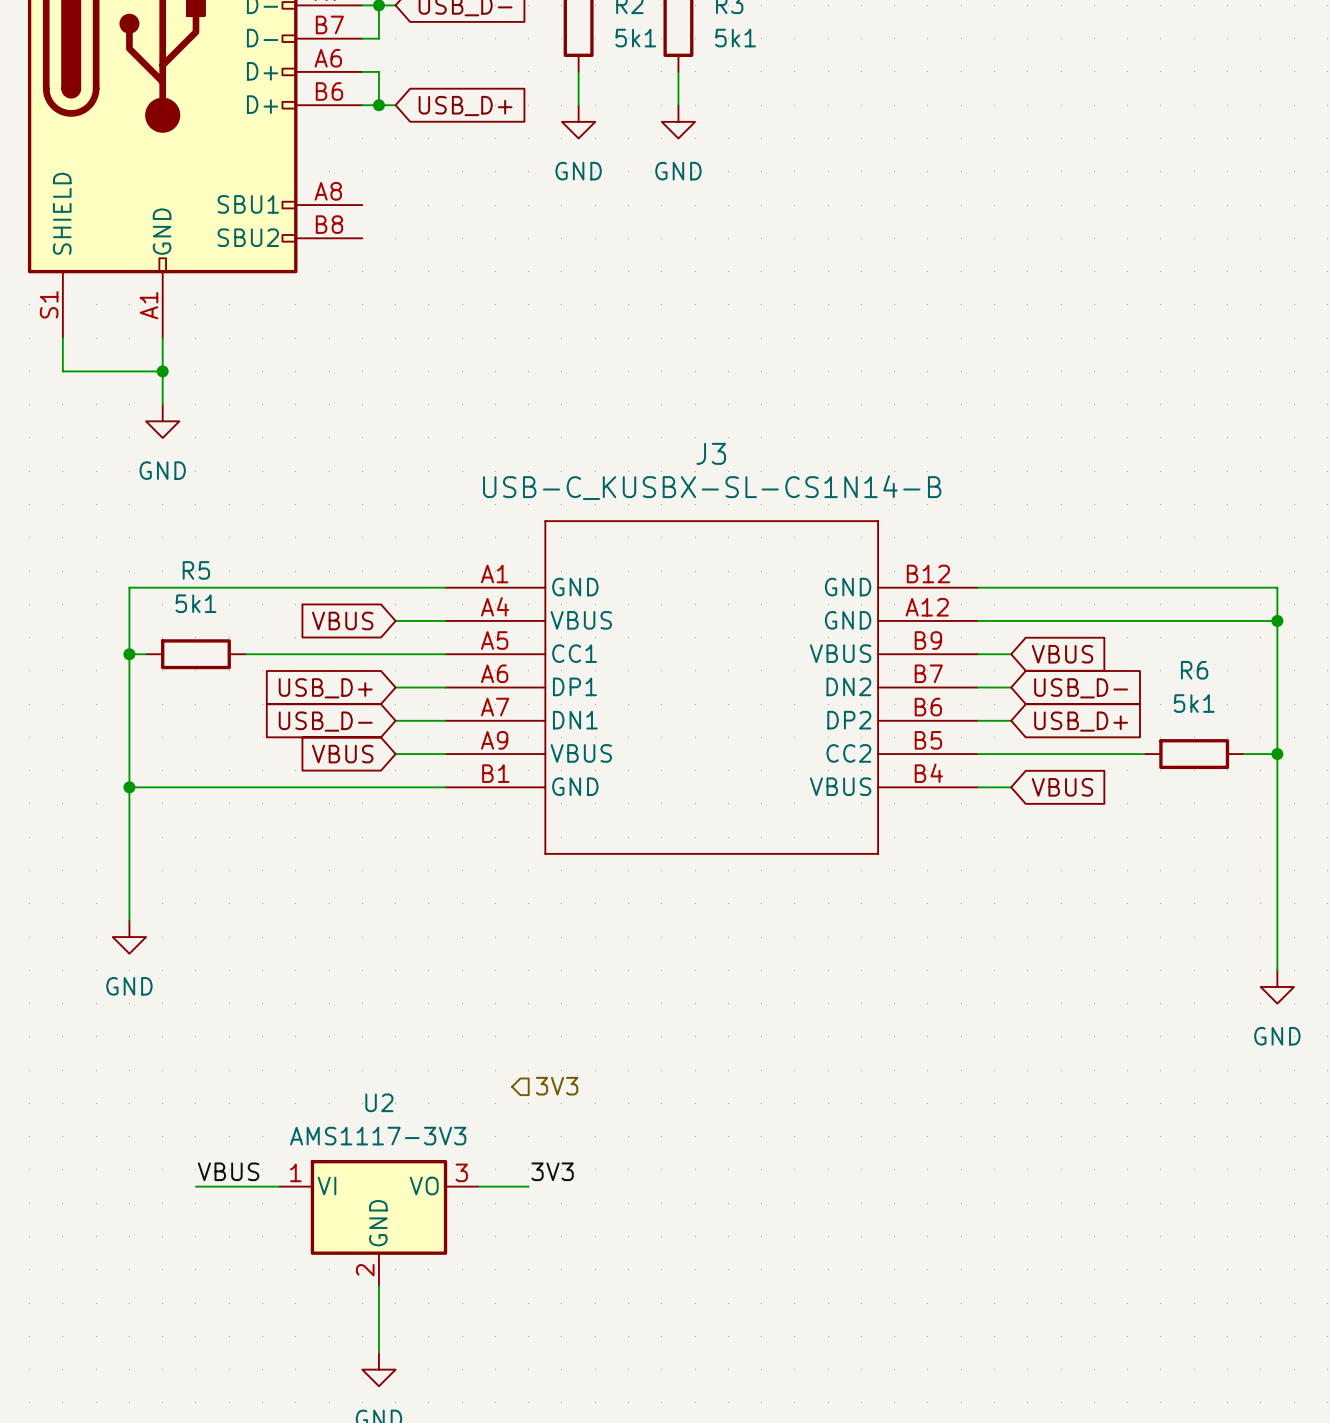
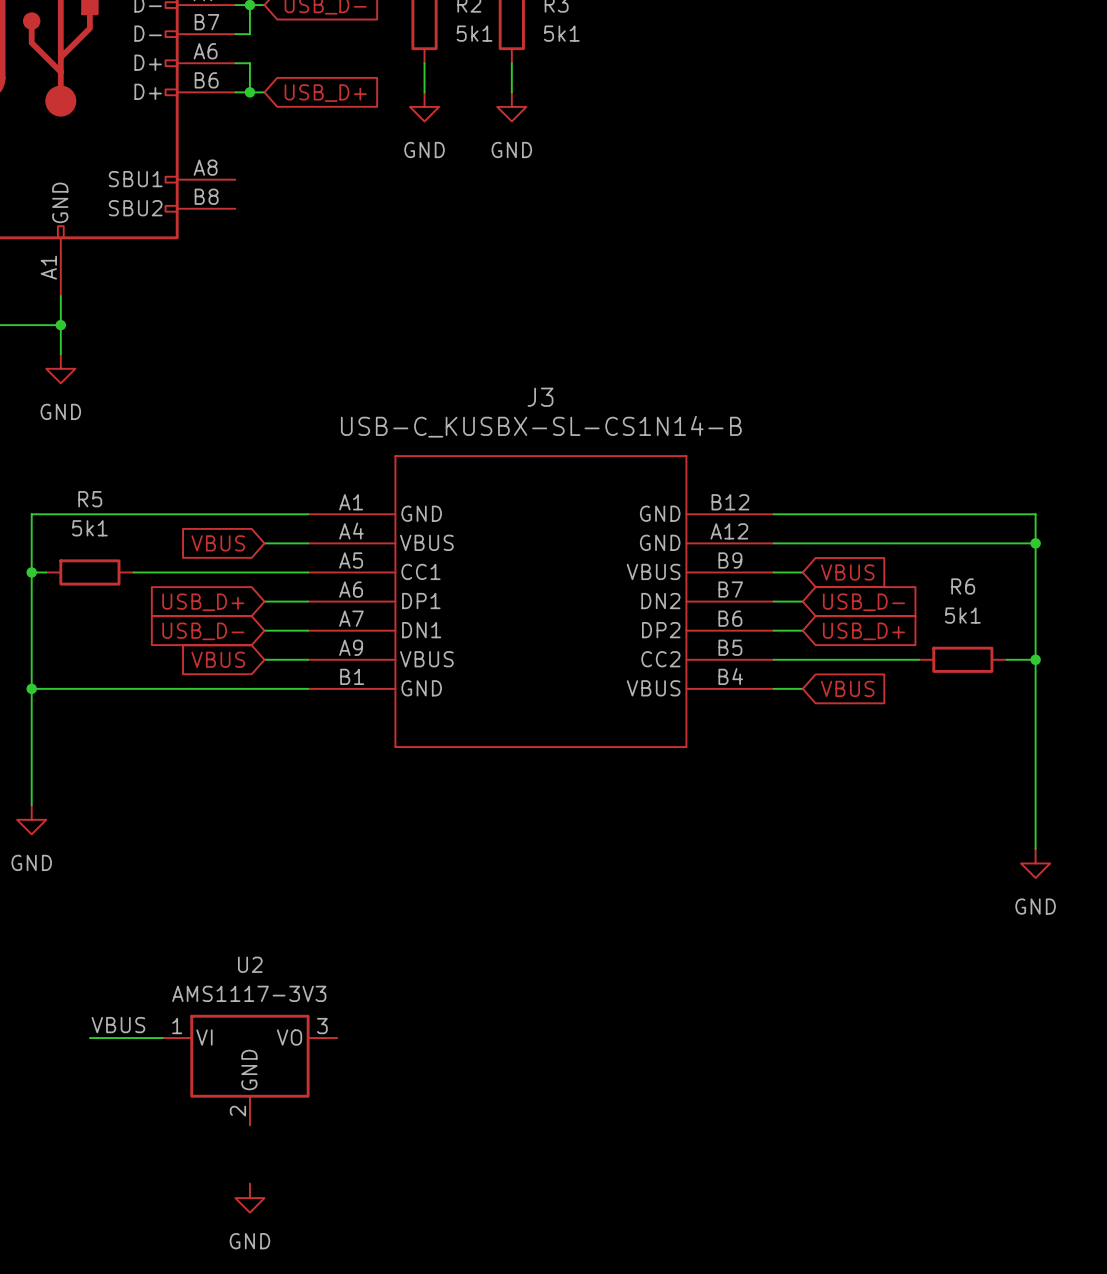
hierarchical label: 3V3 (557, 1086) -> none
label: 3V3 (552, 1171) -> none
wire: (478, 1186) (528, 1186) -> none
wire: (378, 1286) (378, 1352) -> none

